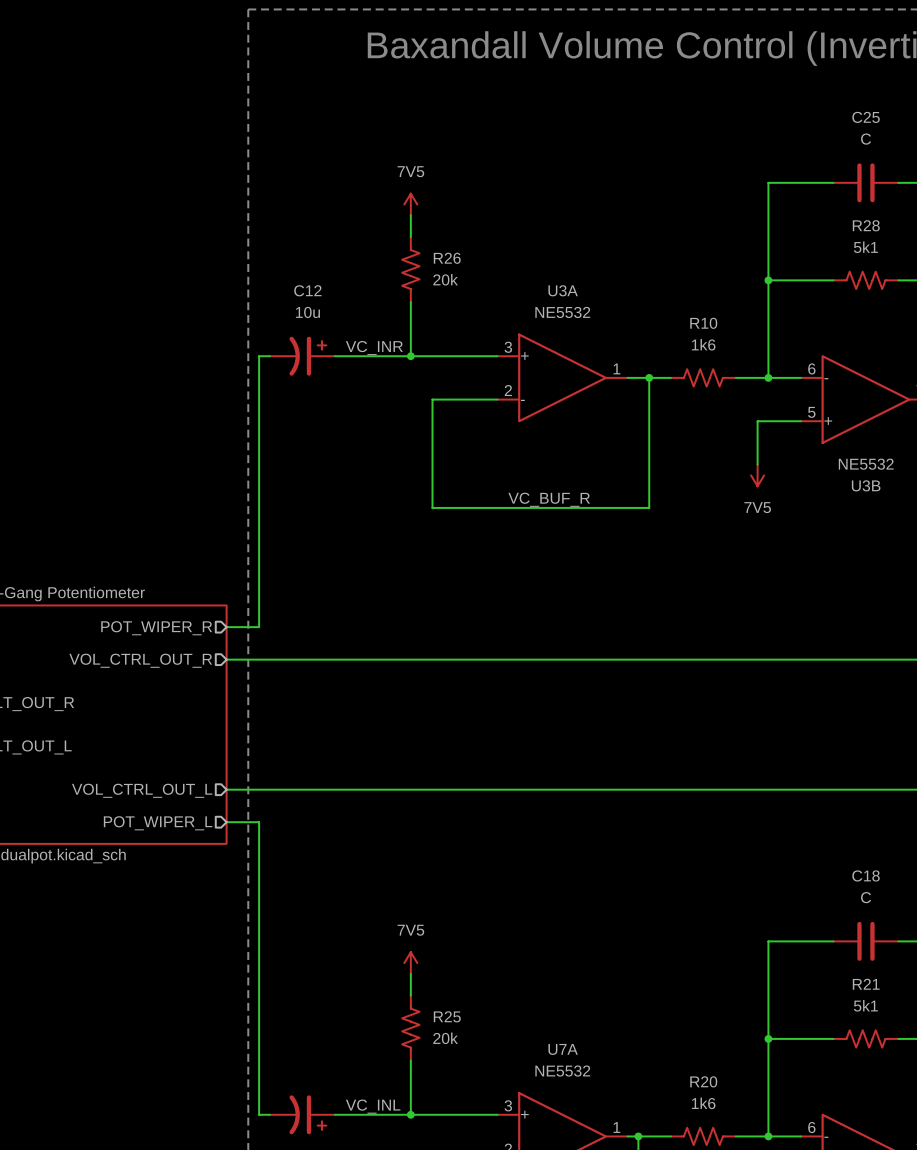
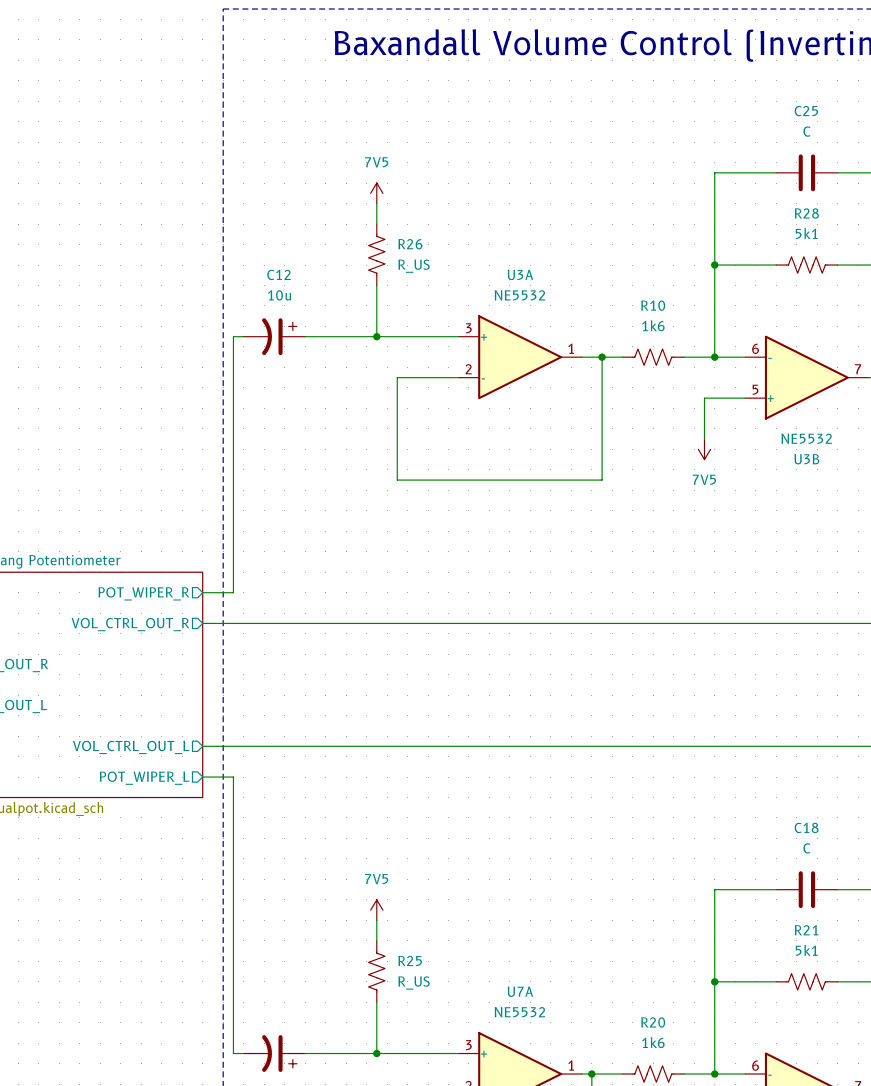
R26 value: 20k (445, 279) -> R_US (414, 266)
label: VC_INR (374, 348) -> none
label: VC_BUF_R (549, 499) -> none
R25 value: 20k (445, 1038) -> R_US (414, 982)
label: VC_INL (373, 1106) -> none

